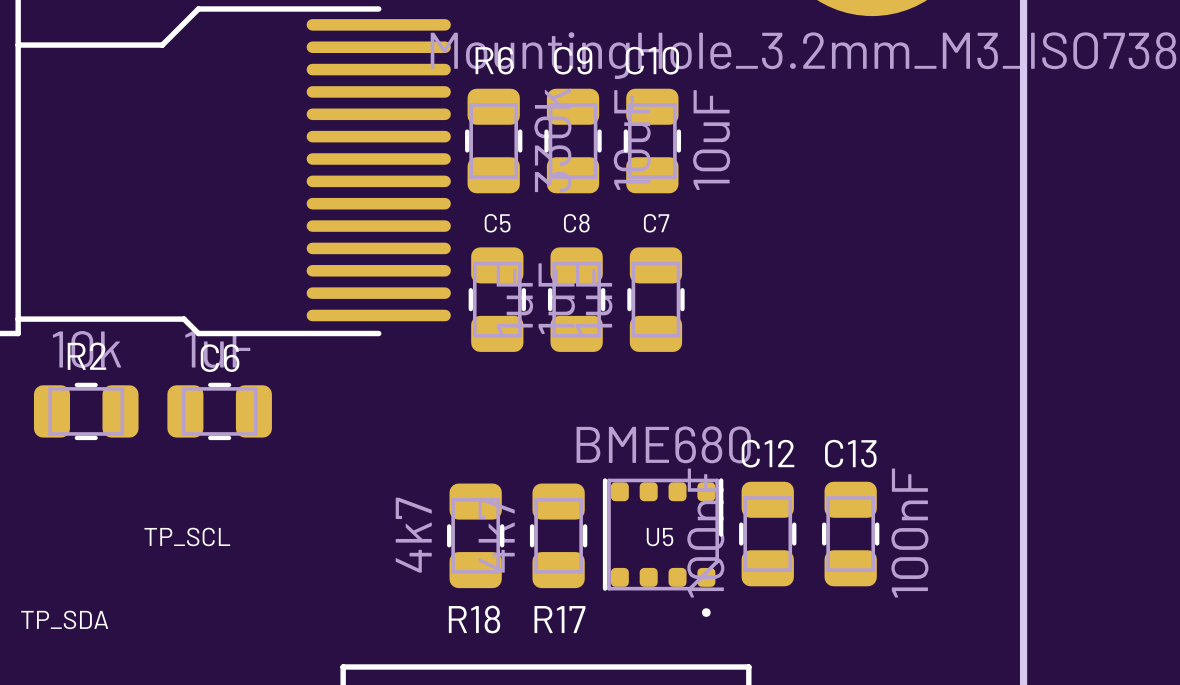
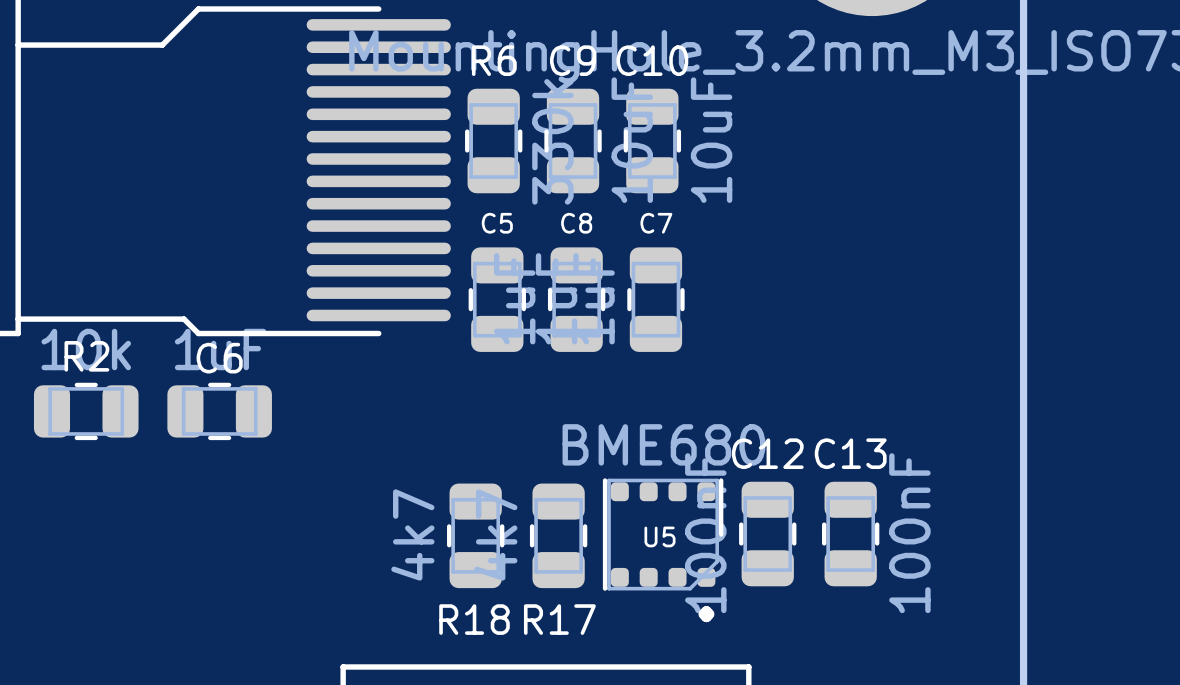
text: TP_SCL (187, 536) -> none
text: TP_SDA (64, 619) -> none

